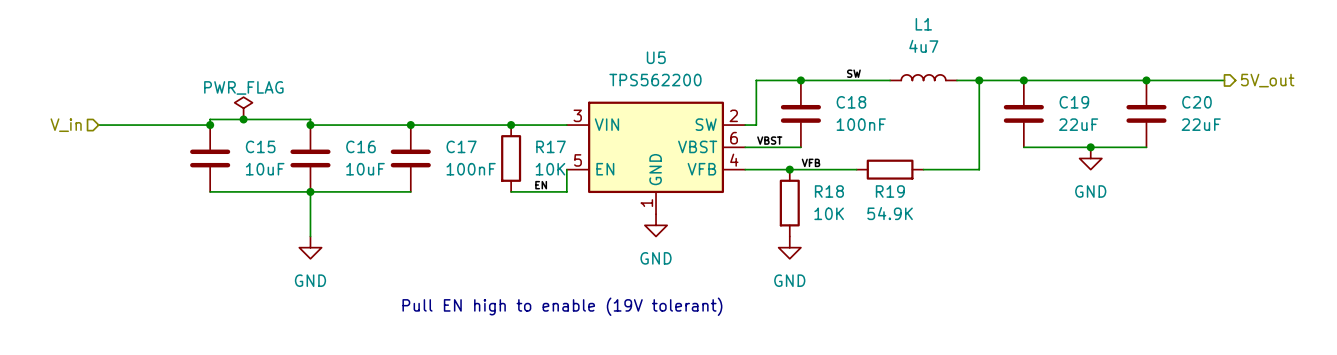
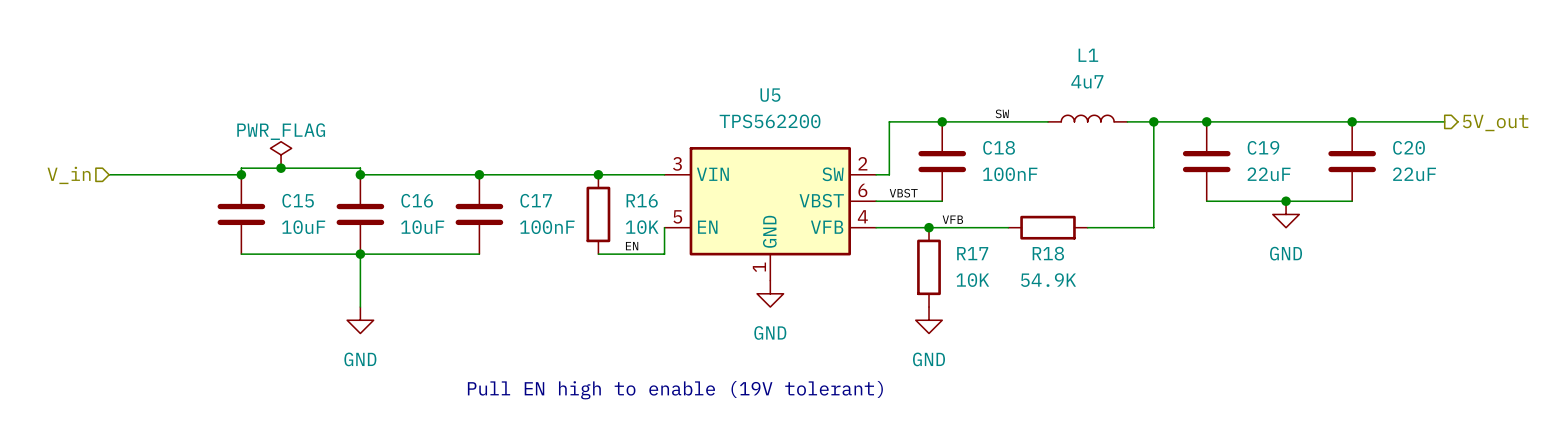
R17 name: R17 (551, 146) -> R16 (642, 200)
R18 name: R18 (829, 191) -> R17 (972, 253)
R19 name: R19 (890, 191) -> R18 (1048, 253)

